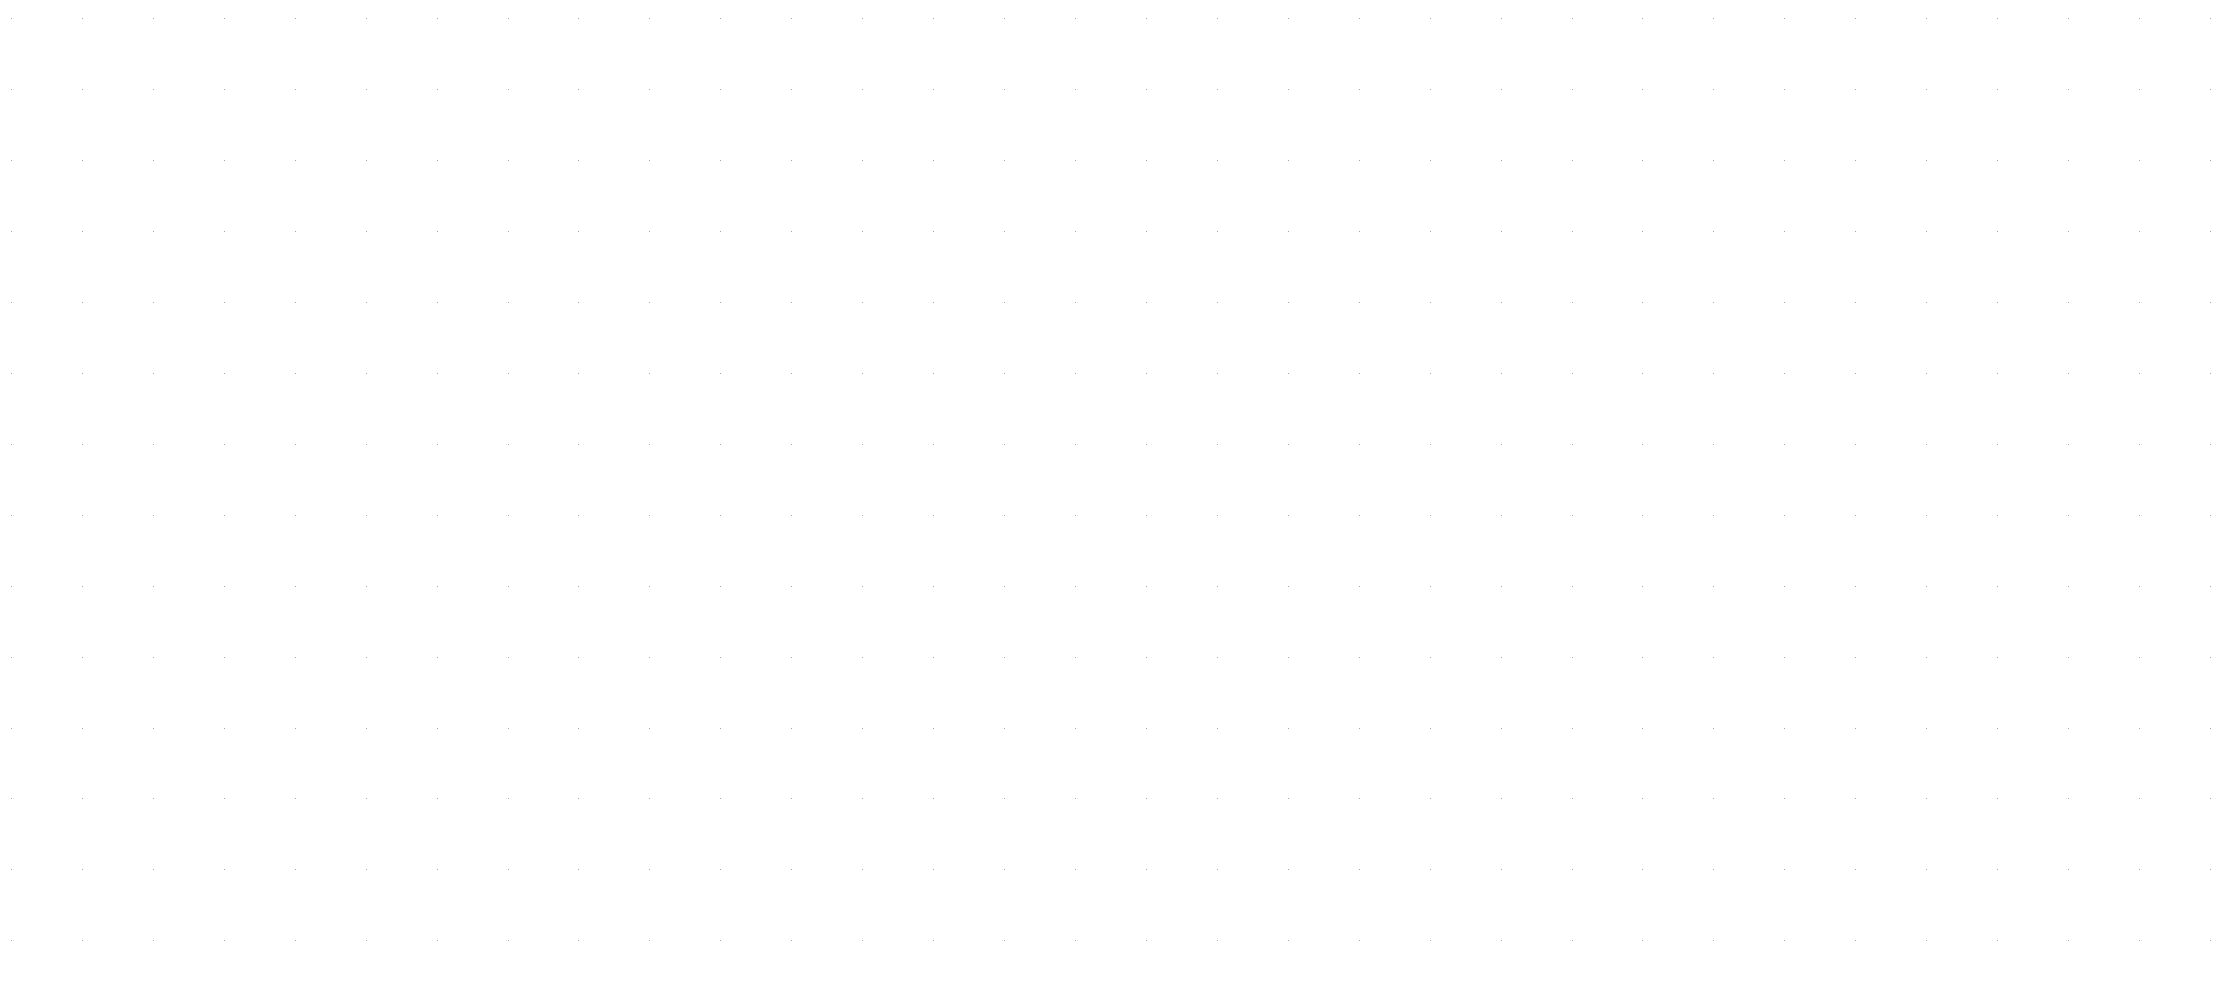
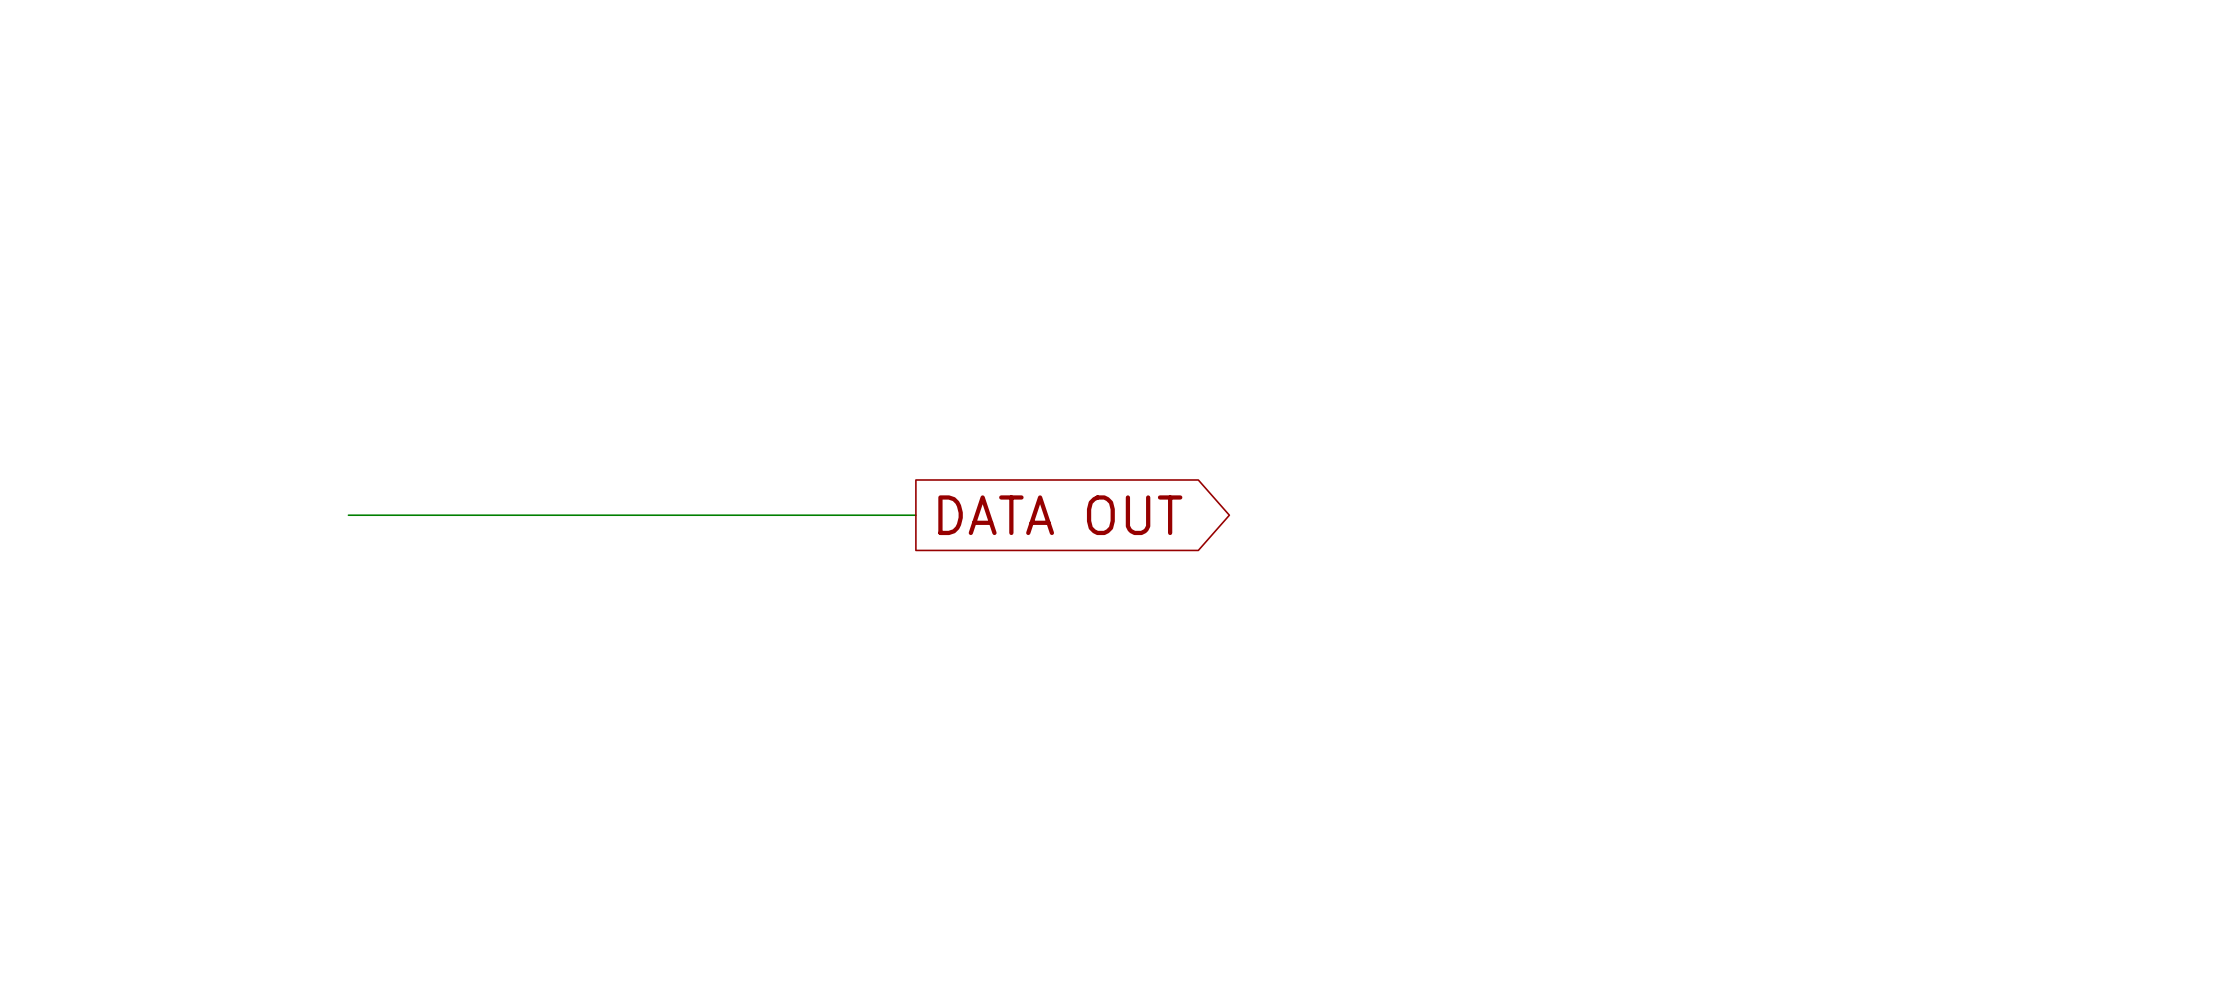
wire: none -> (348, 515) (915, 515)
global label: none -> DATA OUT (1060, 515)

